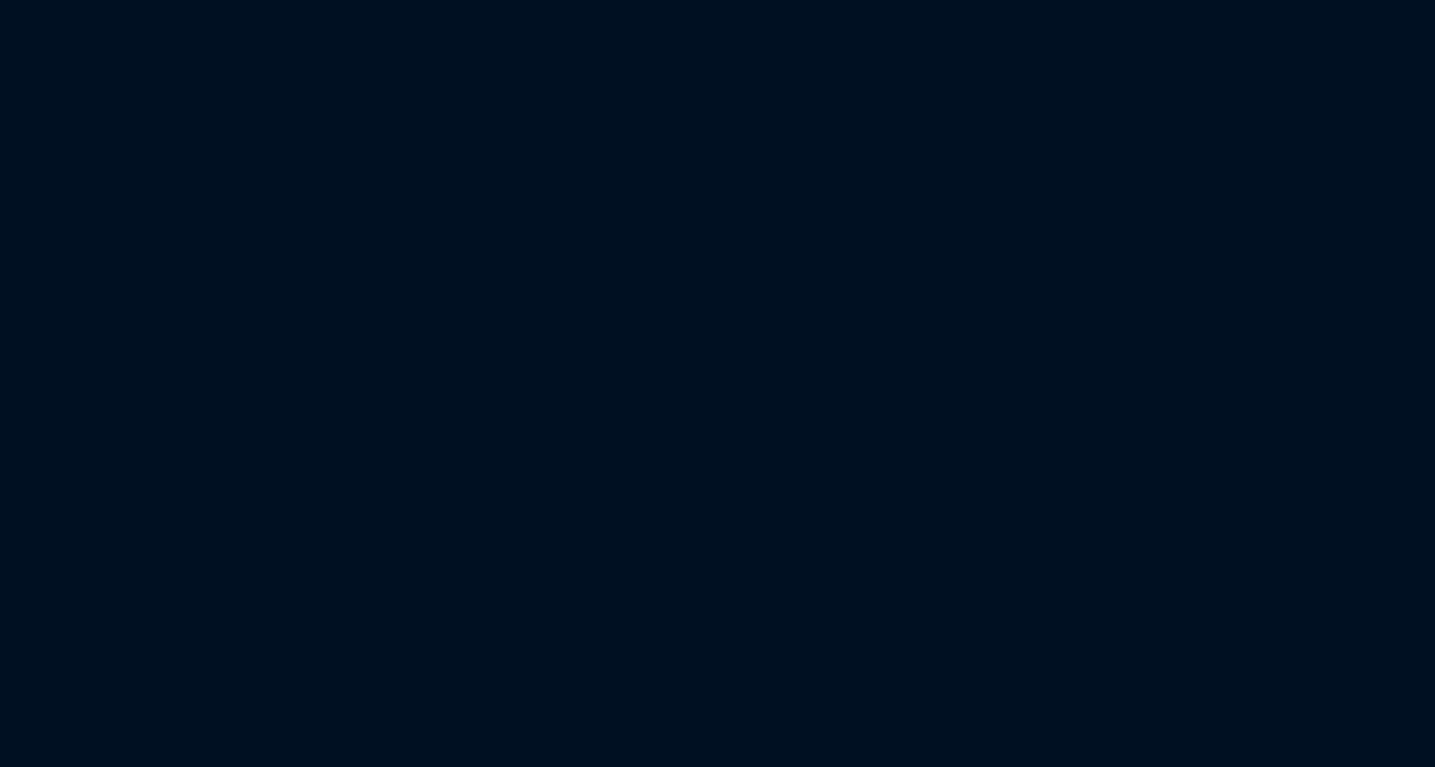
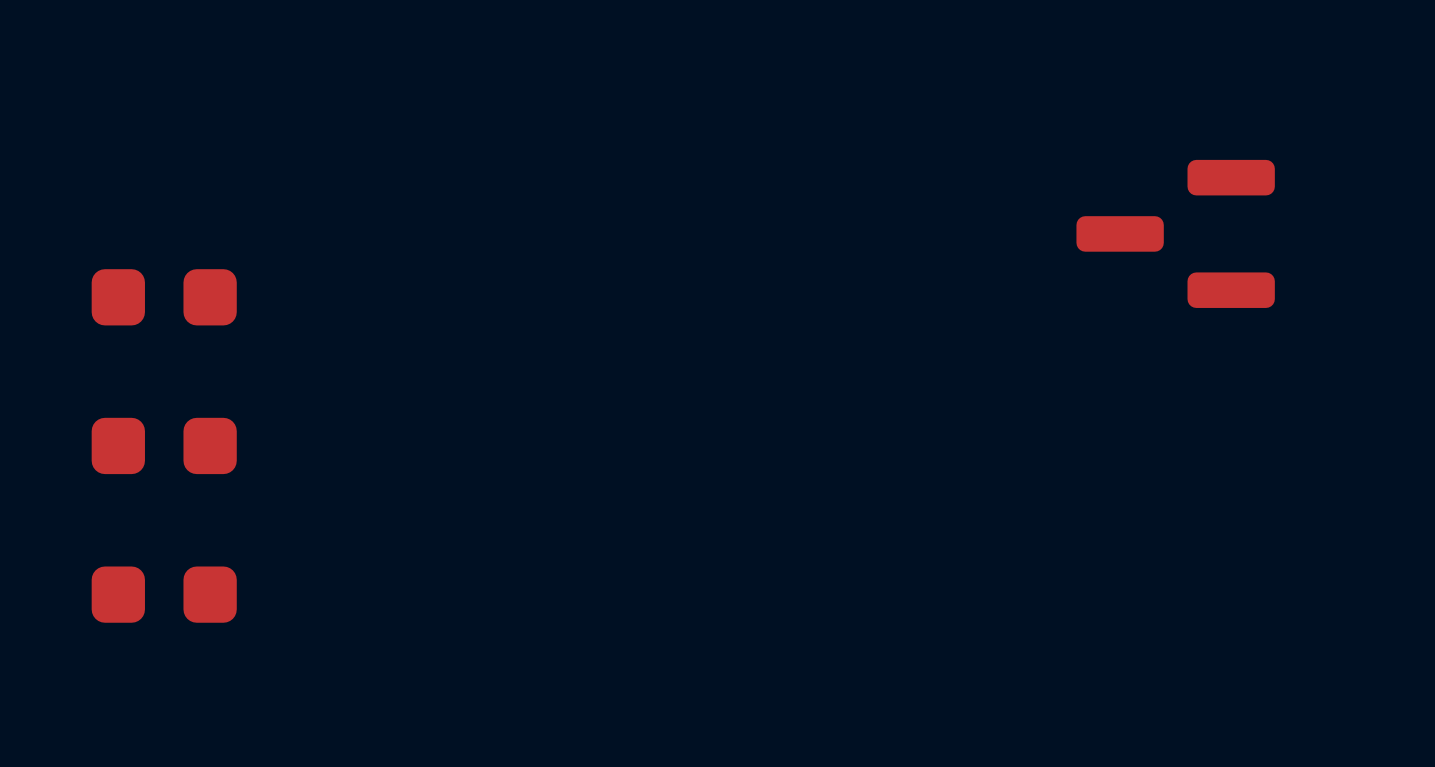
part: none -> (1175, 233)
part: none -> (164, 297)
part: none -> (164, 445)
part: none -> (164, 594)

